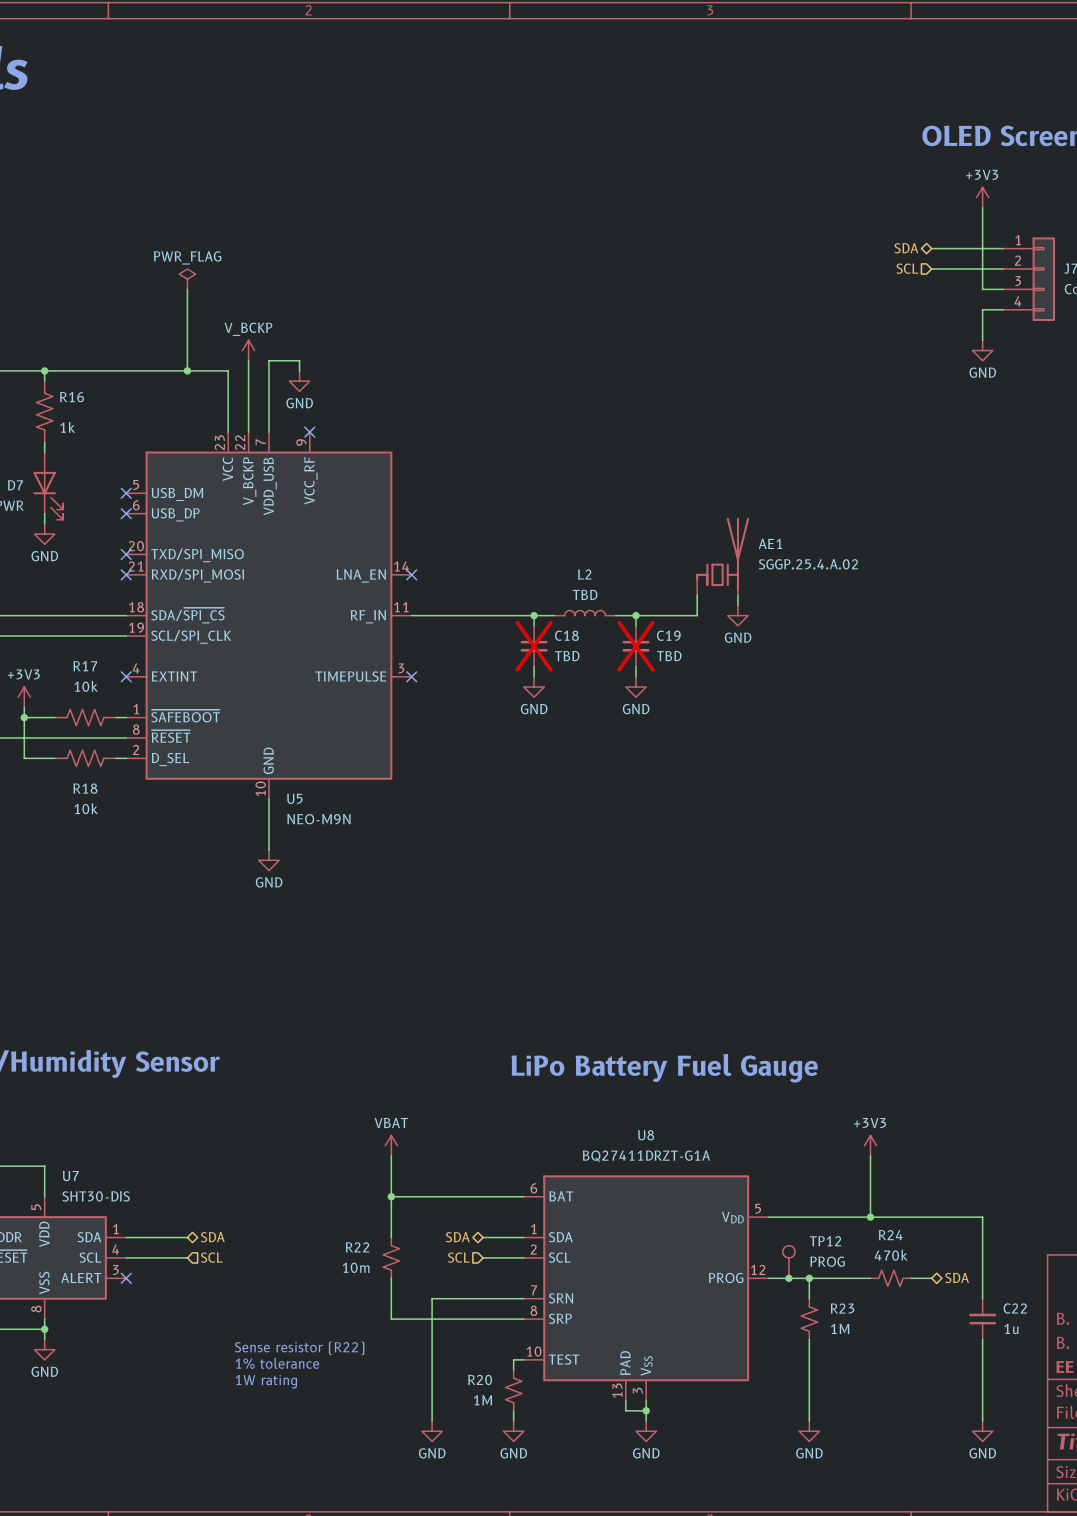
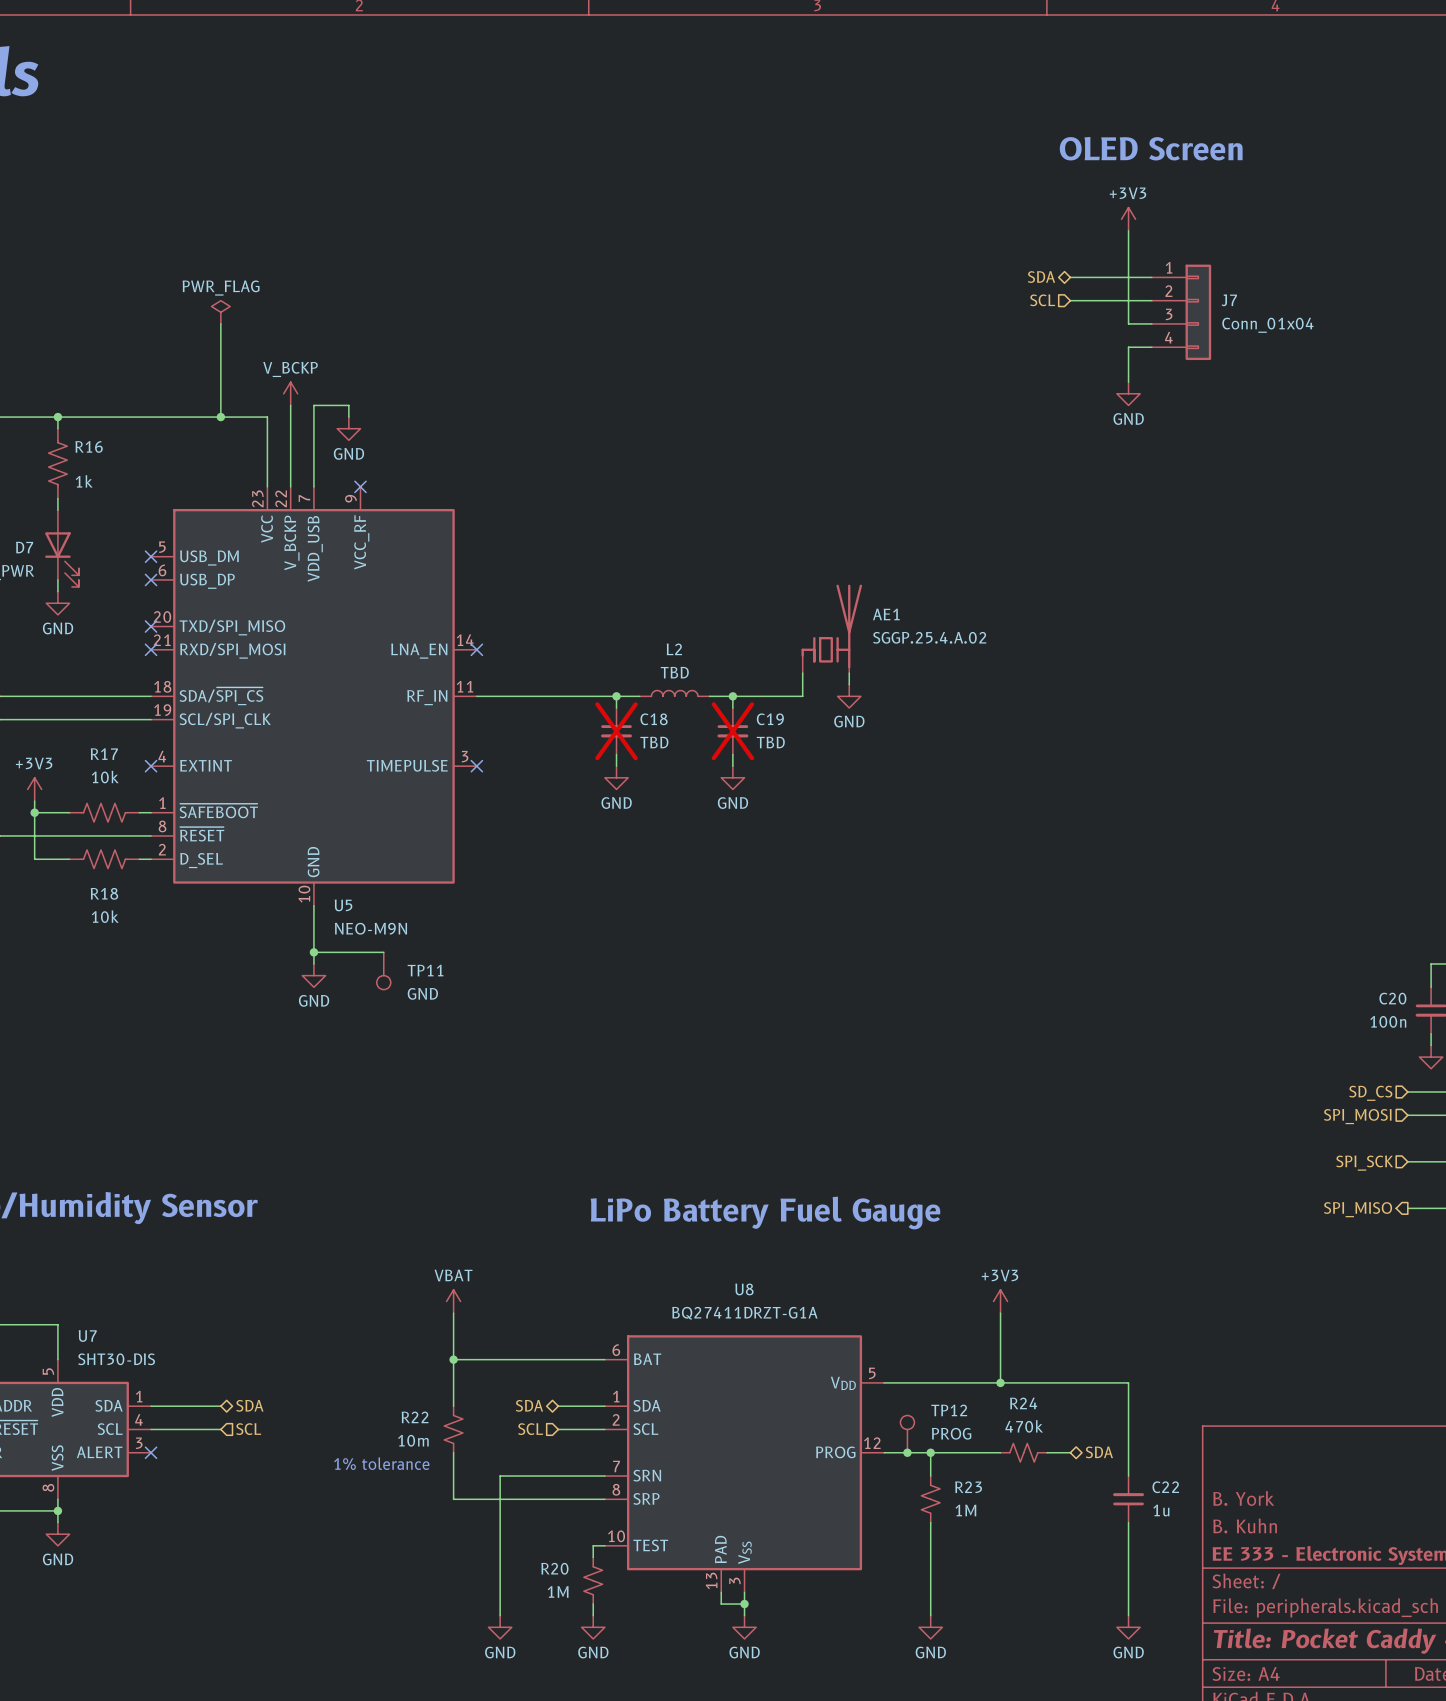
wire: none -> (313, 952) (383, 952)
junction: none -> (313, 952)
TP11: none -> GND (383, 970)
text: Sense resistor (R22) (299, 1348) -> none
text position: 1% tolerance (277, 1363) -> 1% tolerance (381, 1463)
text: 1W rating (266, 1381) -> none

